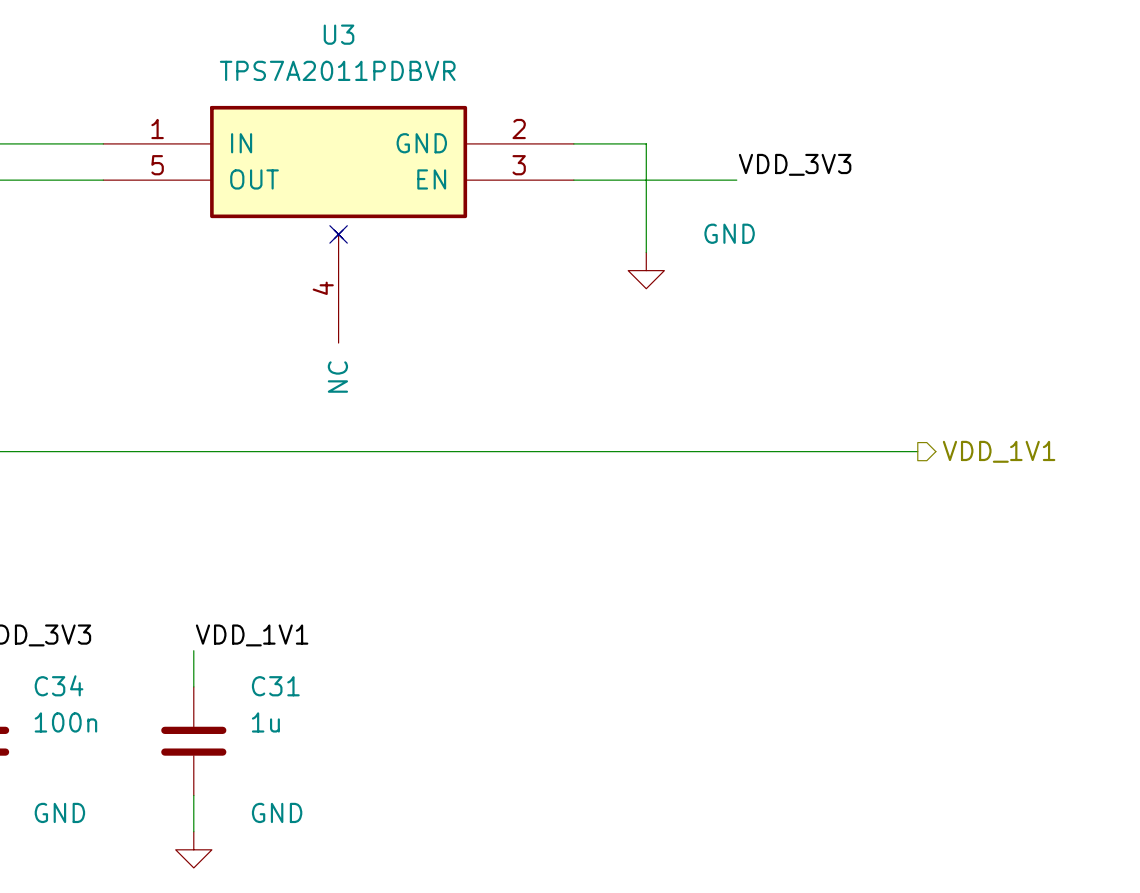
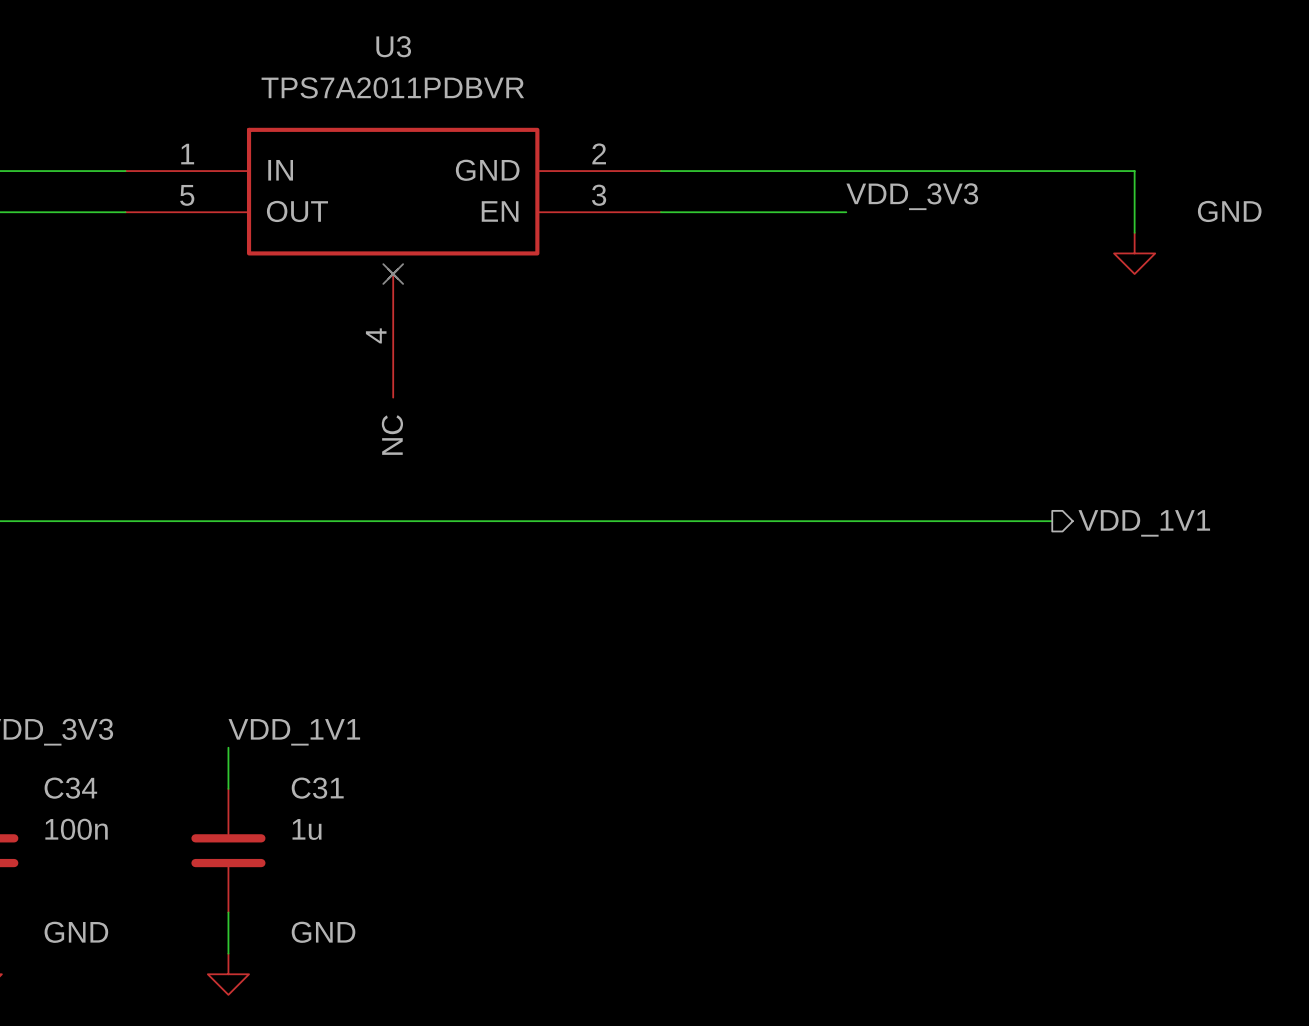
wire: (646, 143) (646, 252) -> (743, 171) (1134, 171) (1134, 232)
power symbol position: GND (646, 270) -> GND (1134, 253)

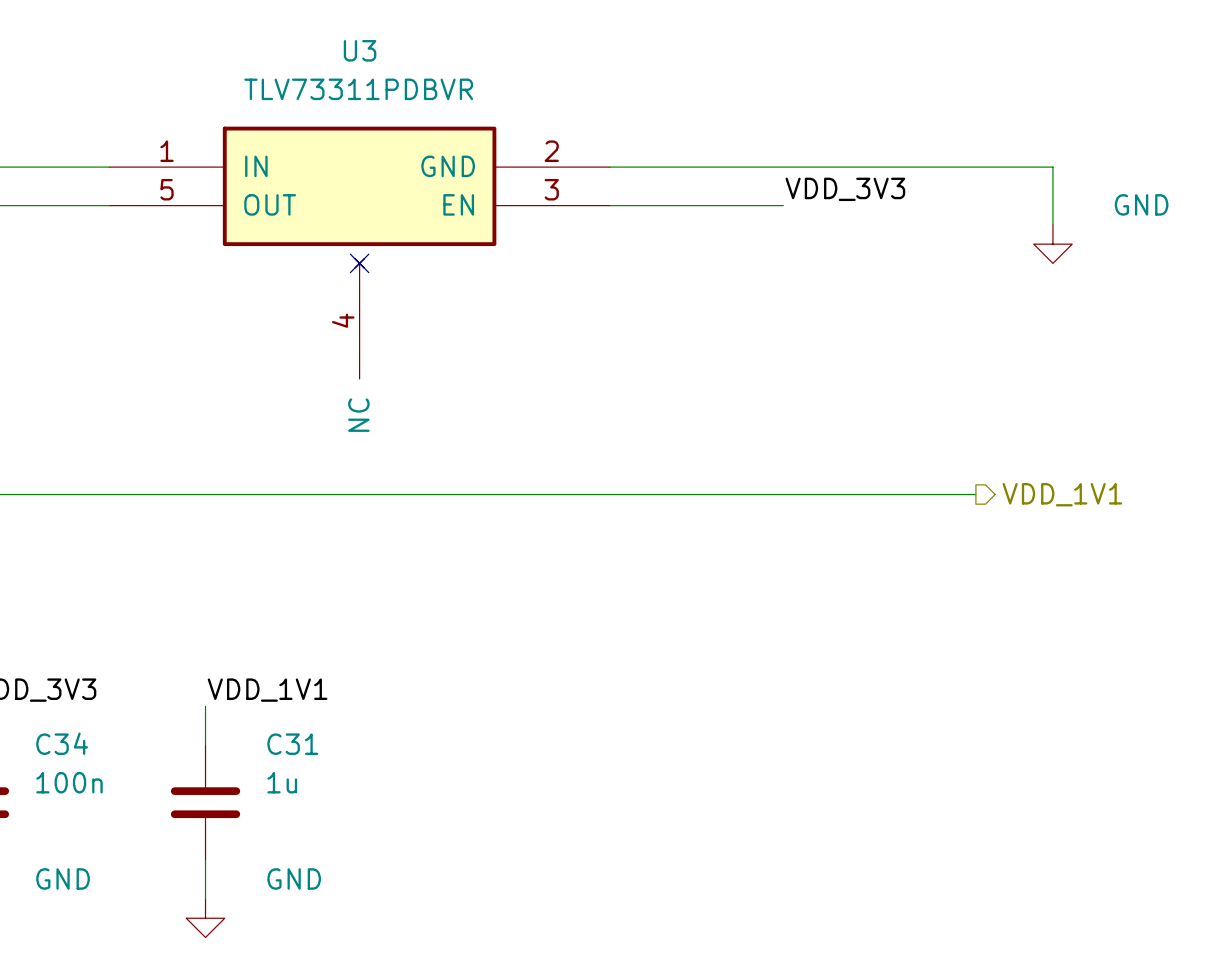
U3 value: TPS7A2011PDBVR (392, 87) -> TLV73311PDBVR (358, 89)

